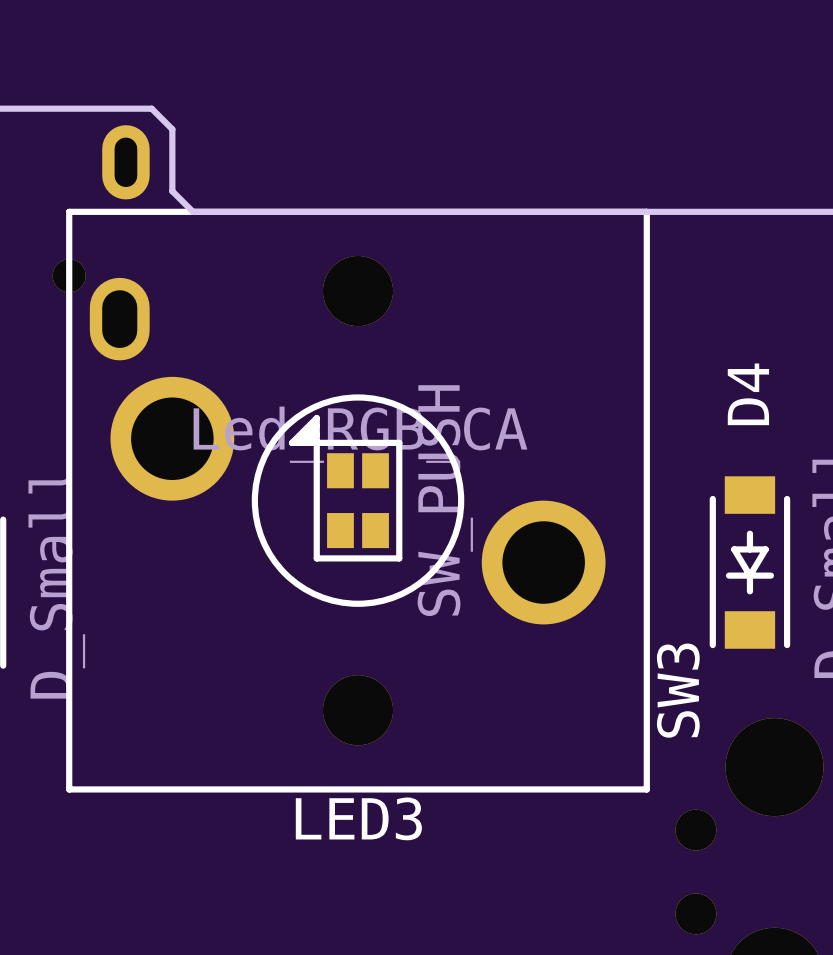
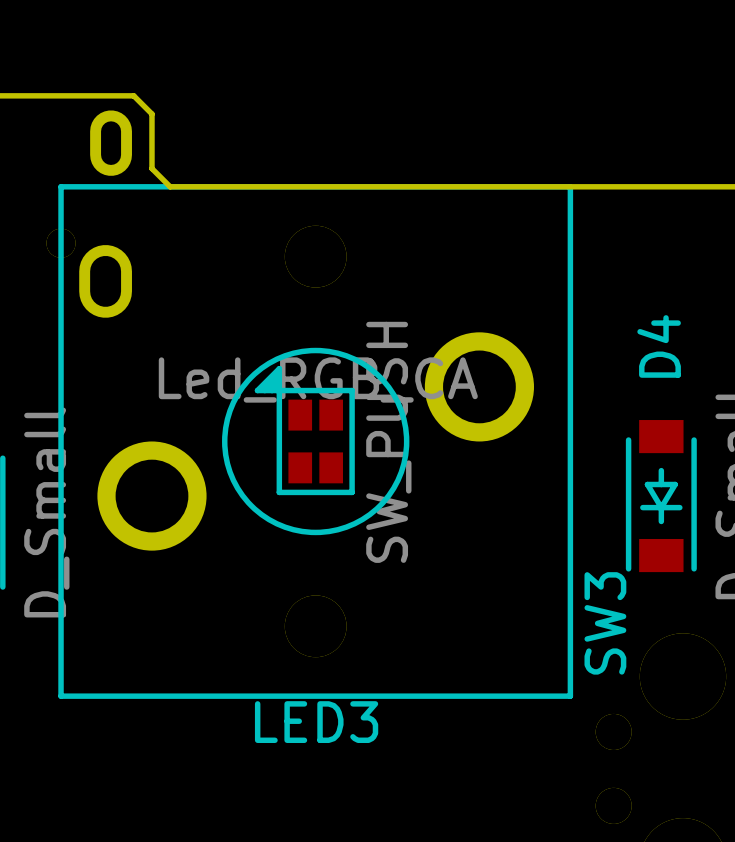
SW3 footprint: [66, 208, 650, 793] -> [58, 184, 574, 699]

